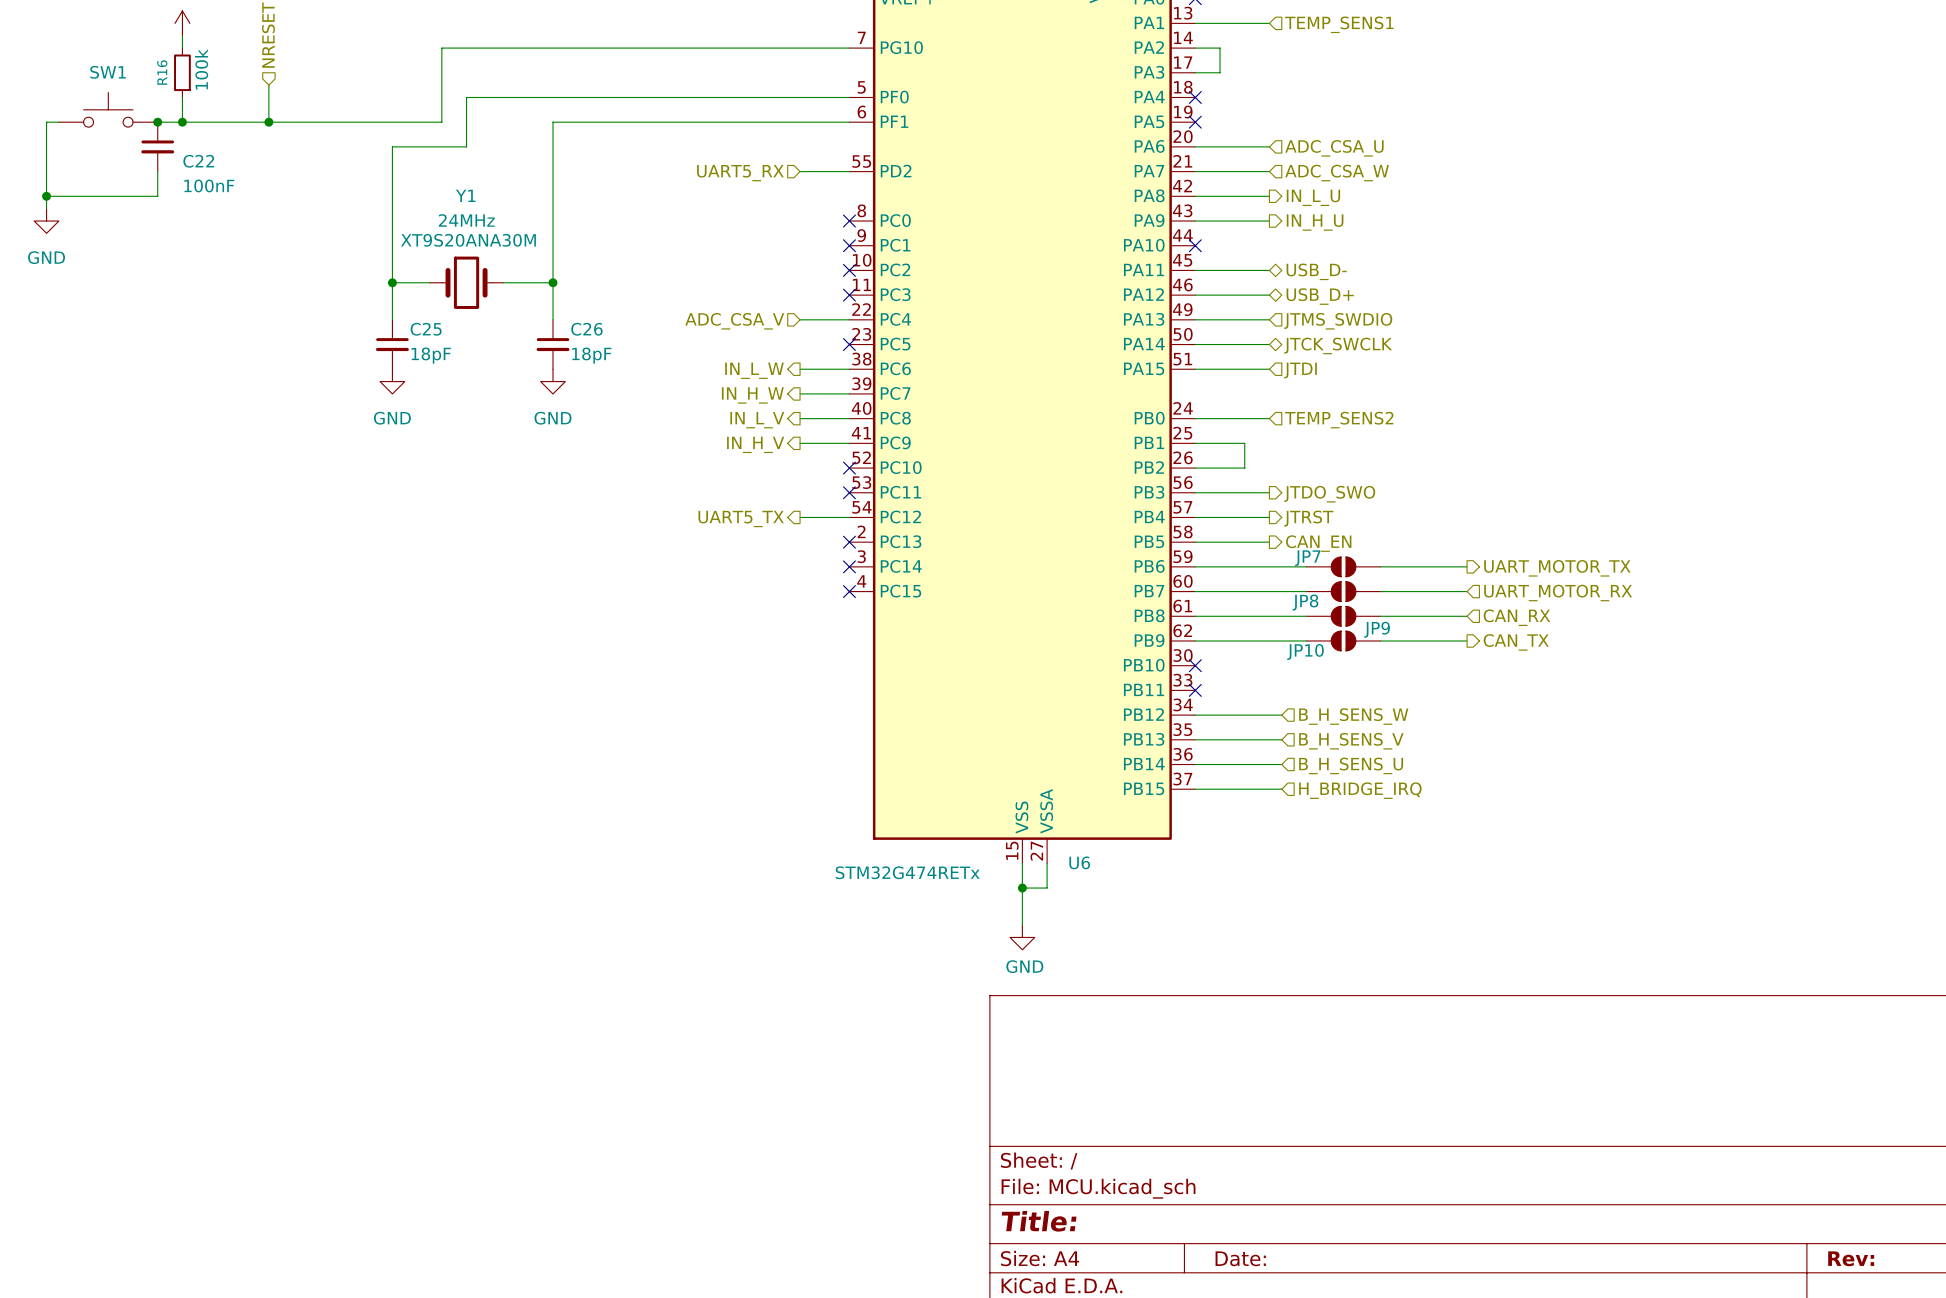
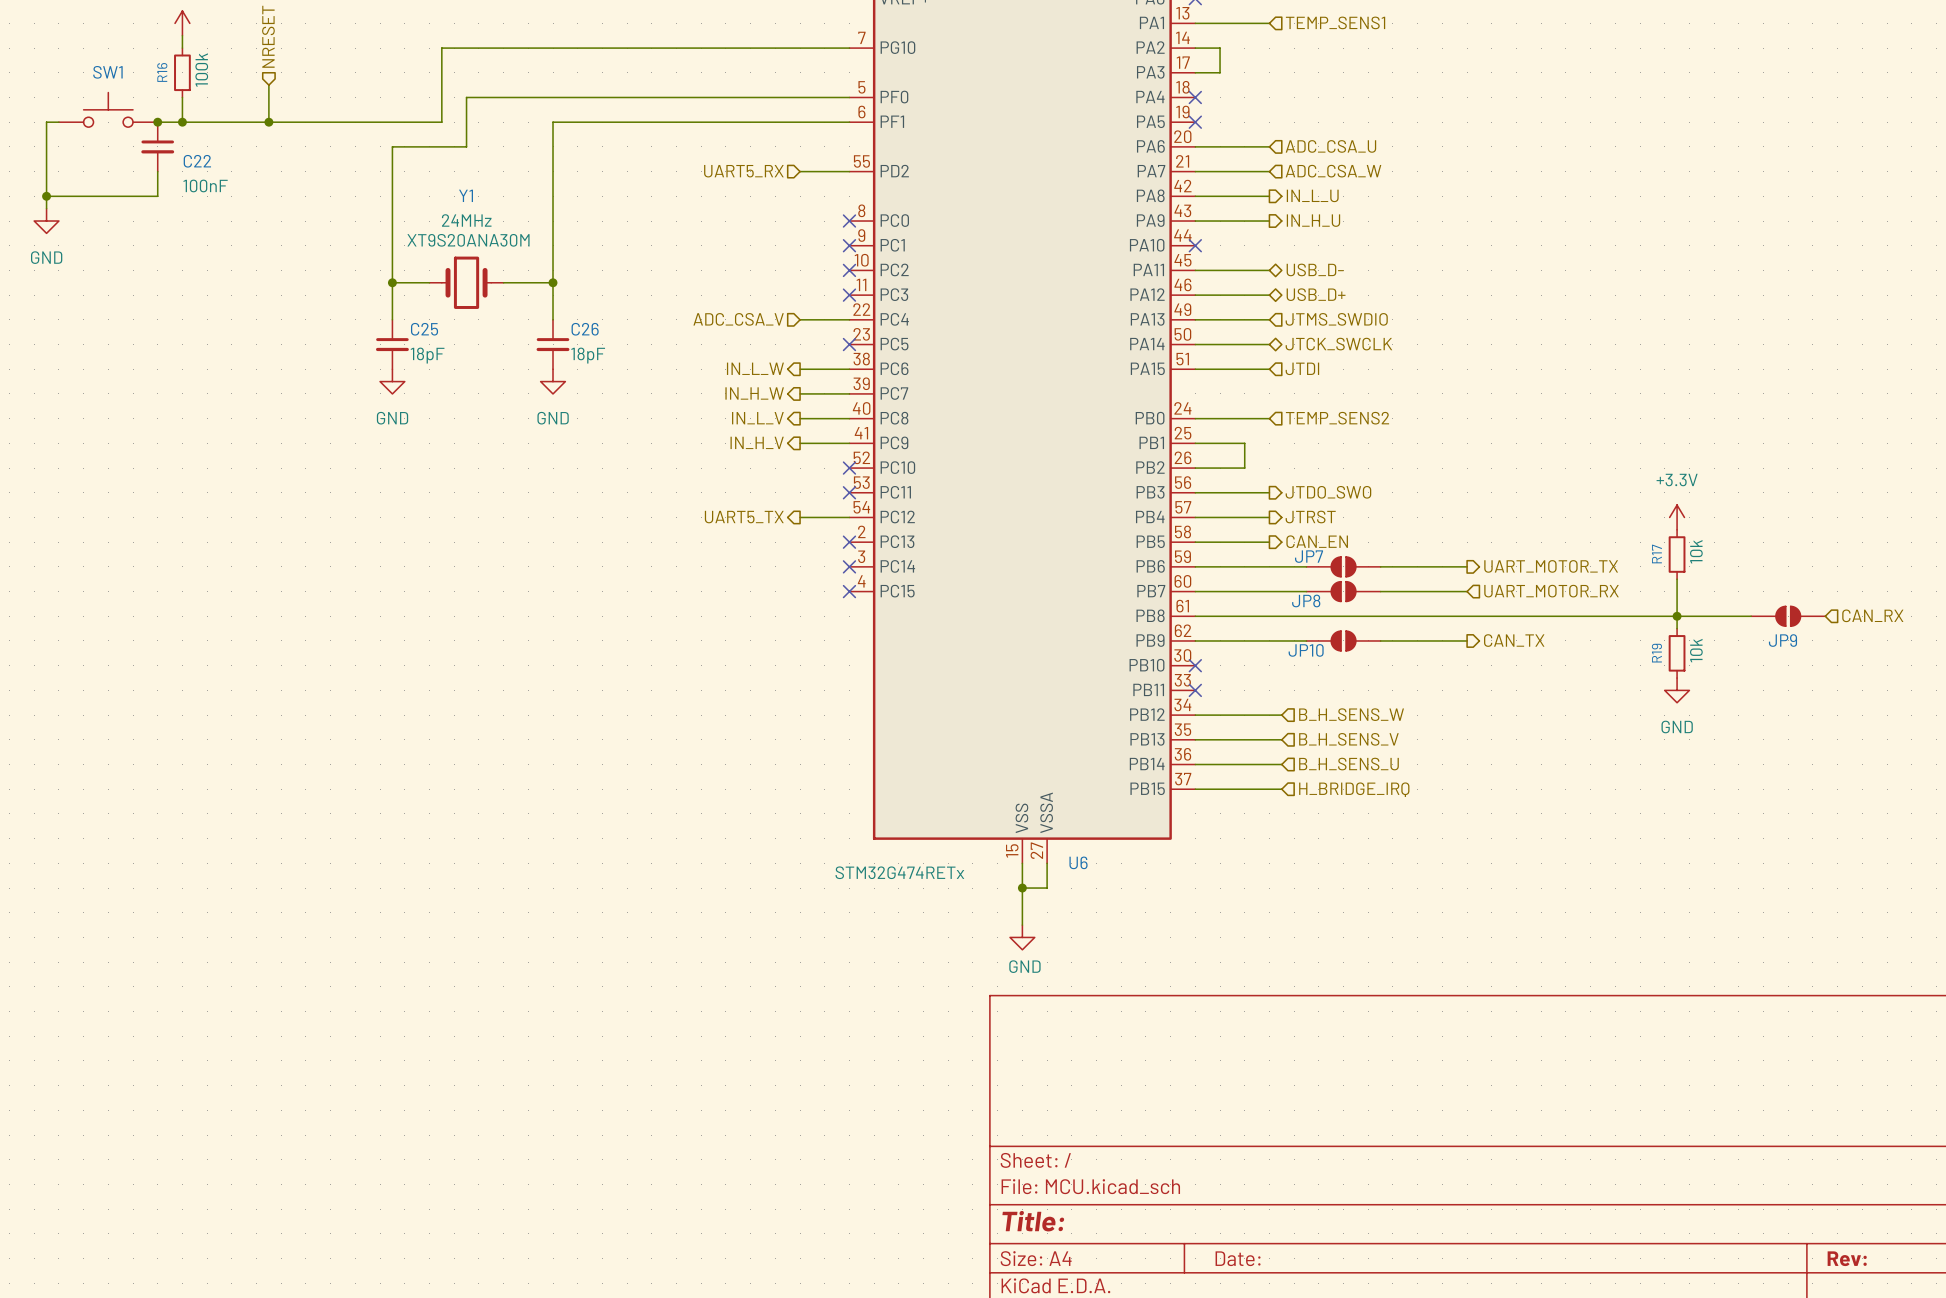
power symbol: none -> +3.3V (1677, 517)
R17: none -> 10k (1677, 554)
wire: none -> (1677, 579) (1677, 628)
JP9 position: (1343, 616) -> (1788, 616)
wire: none -> (1467, 616) (1751, 616)
junction: none -> (1677, 616)
hierarchical label: CAN_RX (1516, 617) -> none
hierarchical label: none -> CAN_RX (1872, 615)
JP9 name position: JP9 (1377, 629) -> JP9 (1782, 640)
R19: none -> 10k (1677, 653)
power symbol: none -> GND (1677, 690)

